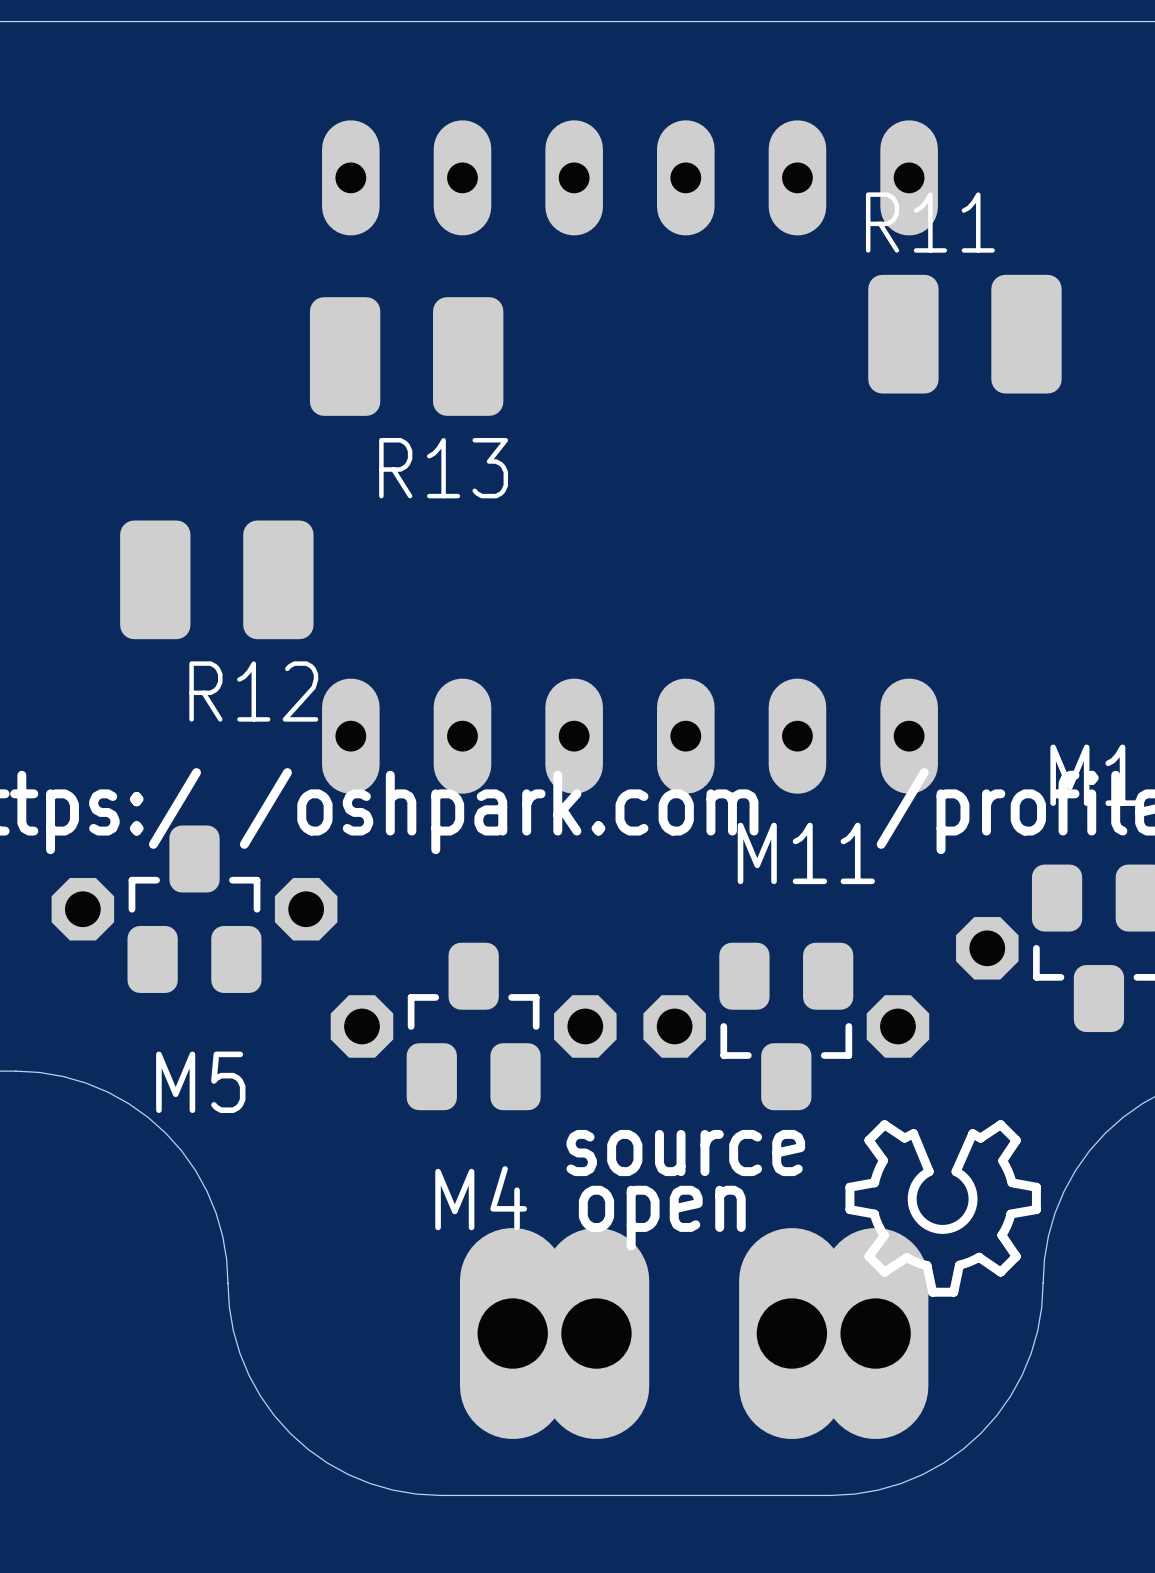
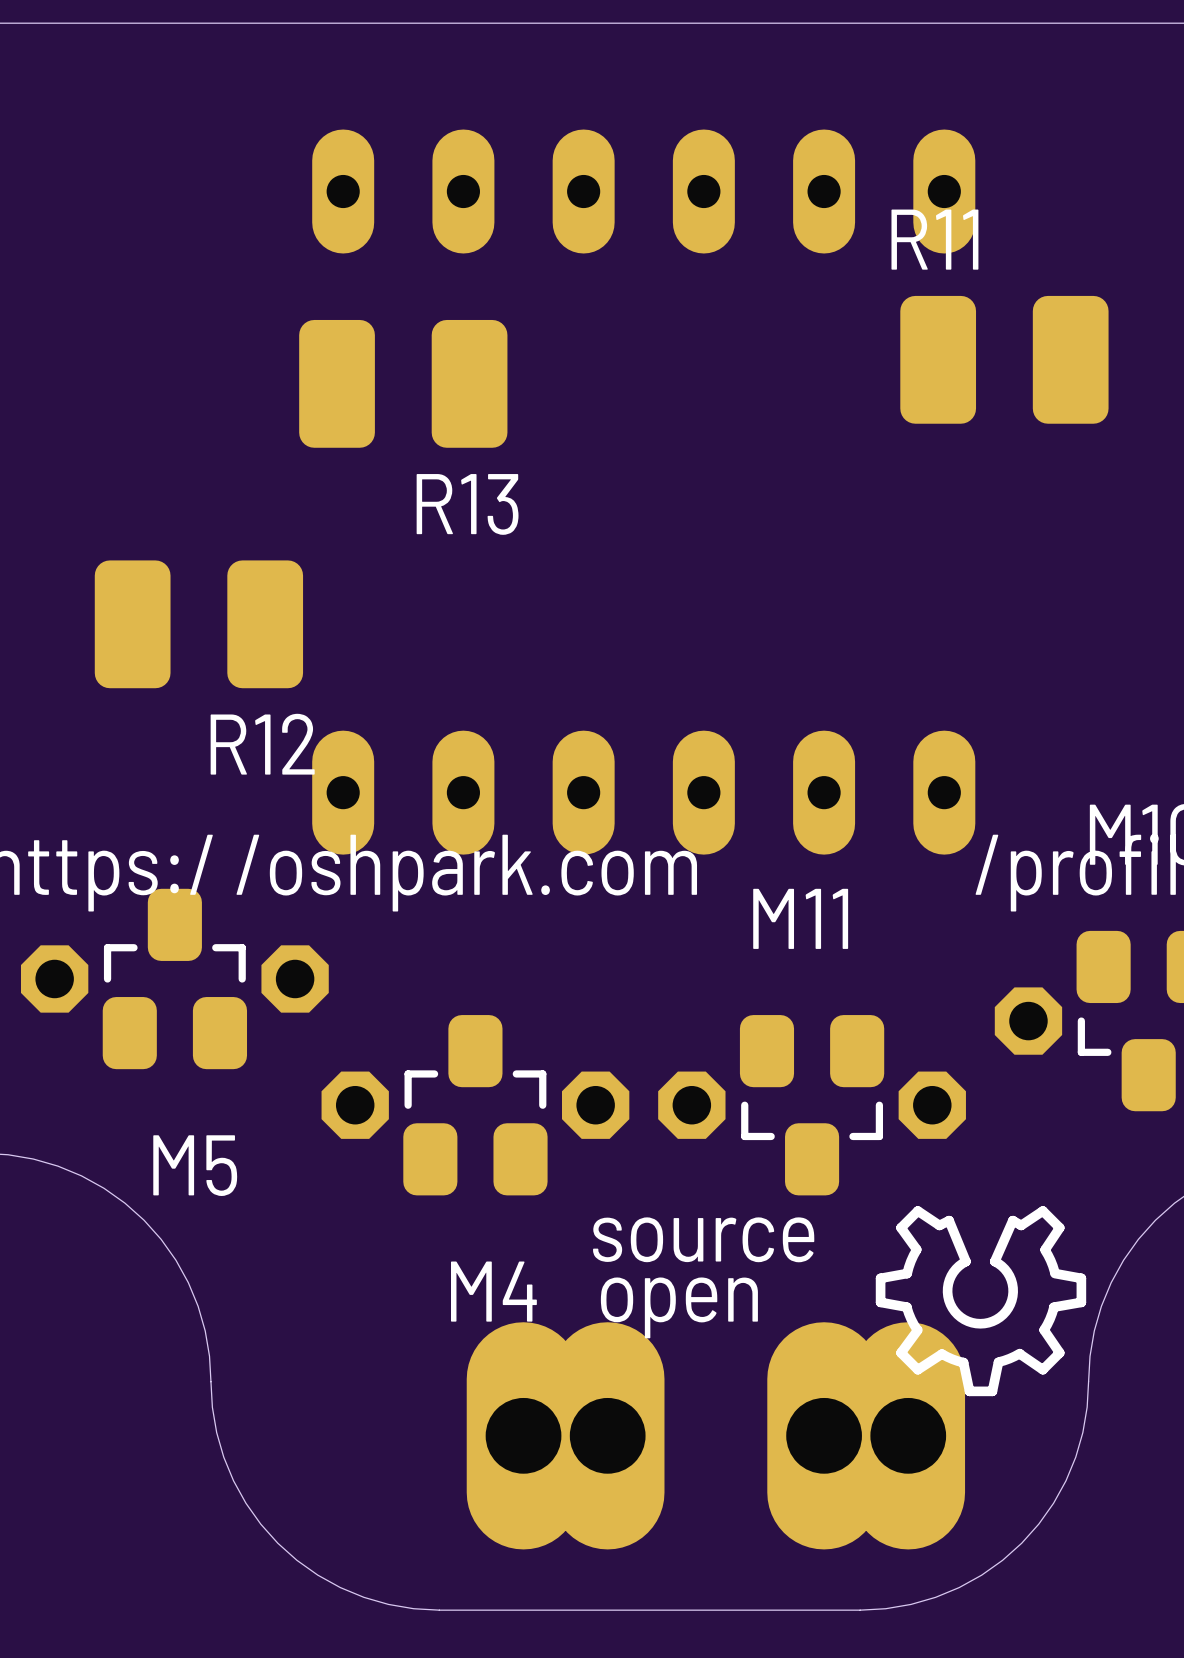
part footprint: [459, 1228, 929, 1440] -> [466, 1322, 966, 1550]

